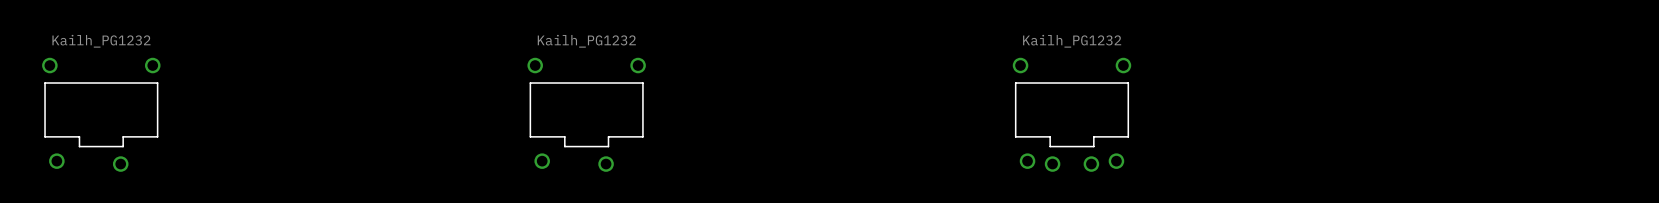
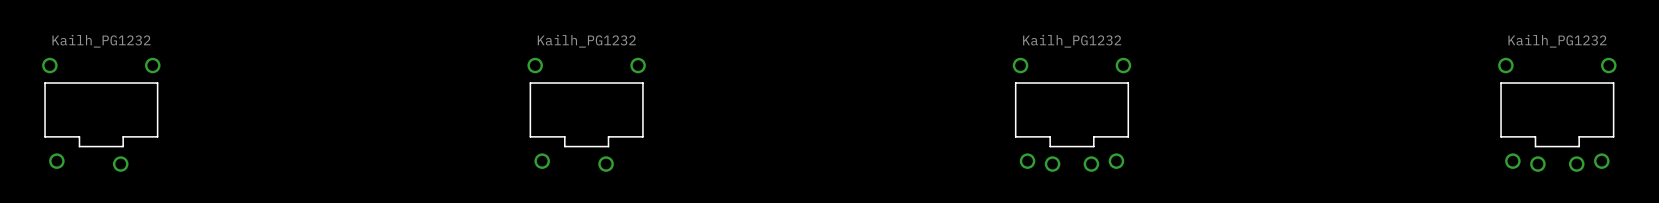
part: none -> Kailh_PG1232 (1557, 114)

